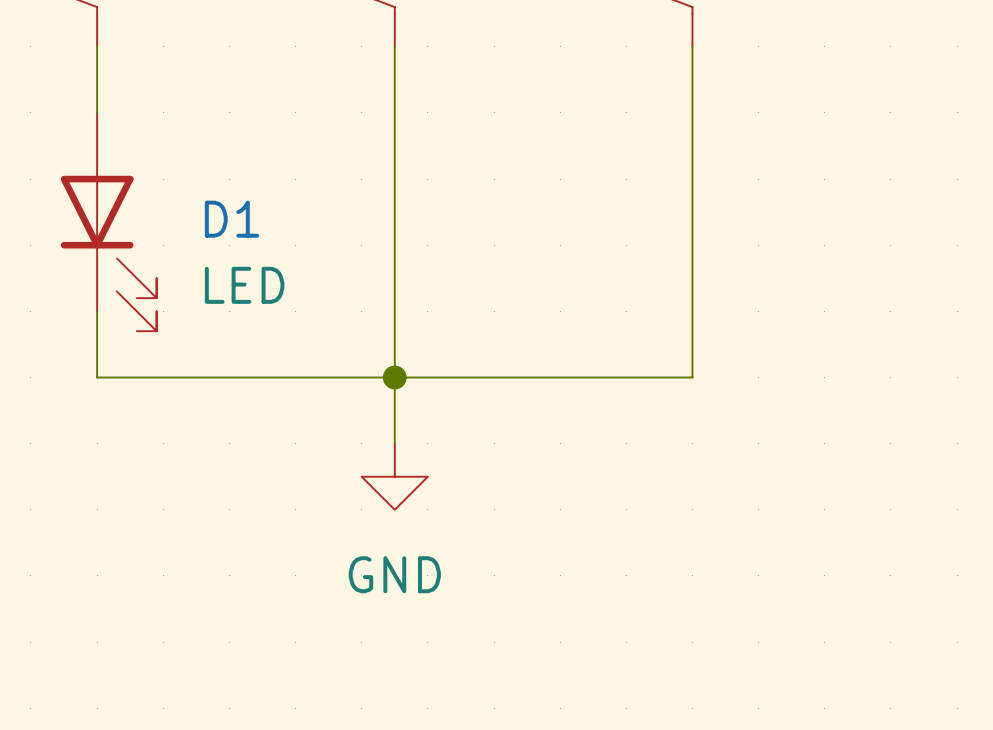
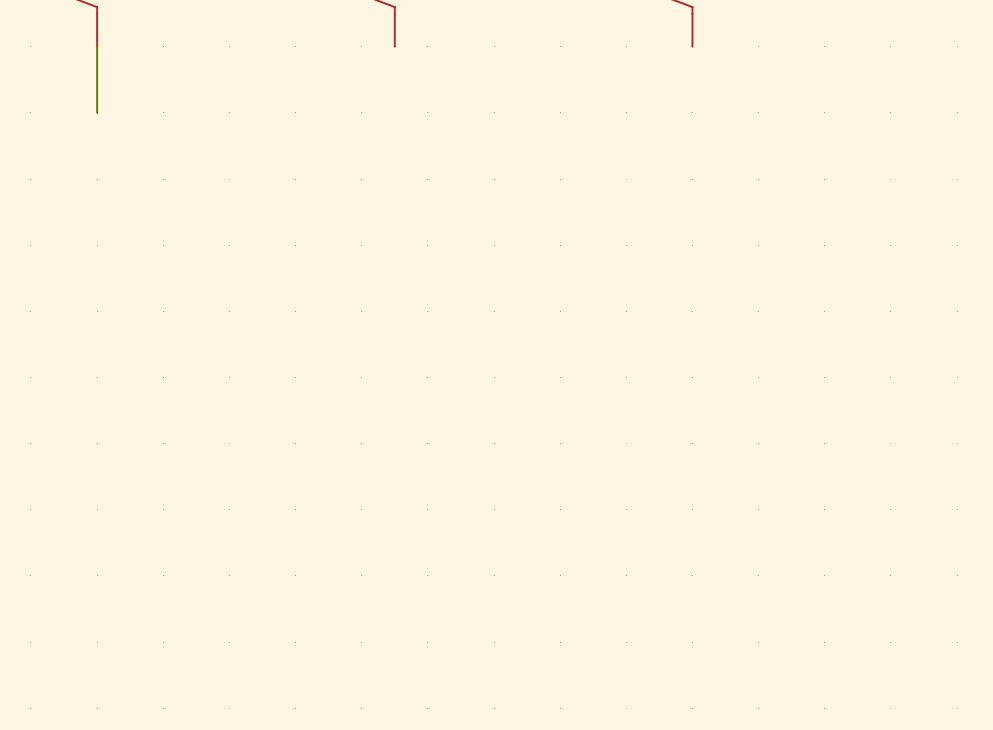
wire: (394, 46) (394, 443) -> none
wire: (692, 46) (692, 377) (97, 377) (97, 311) -> none
D1: LED (108, 222) -> none
junction: (394, 377) -> none
power symbol: GND (394, 476) -> none

